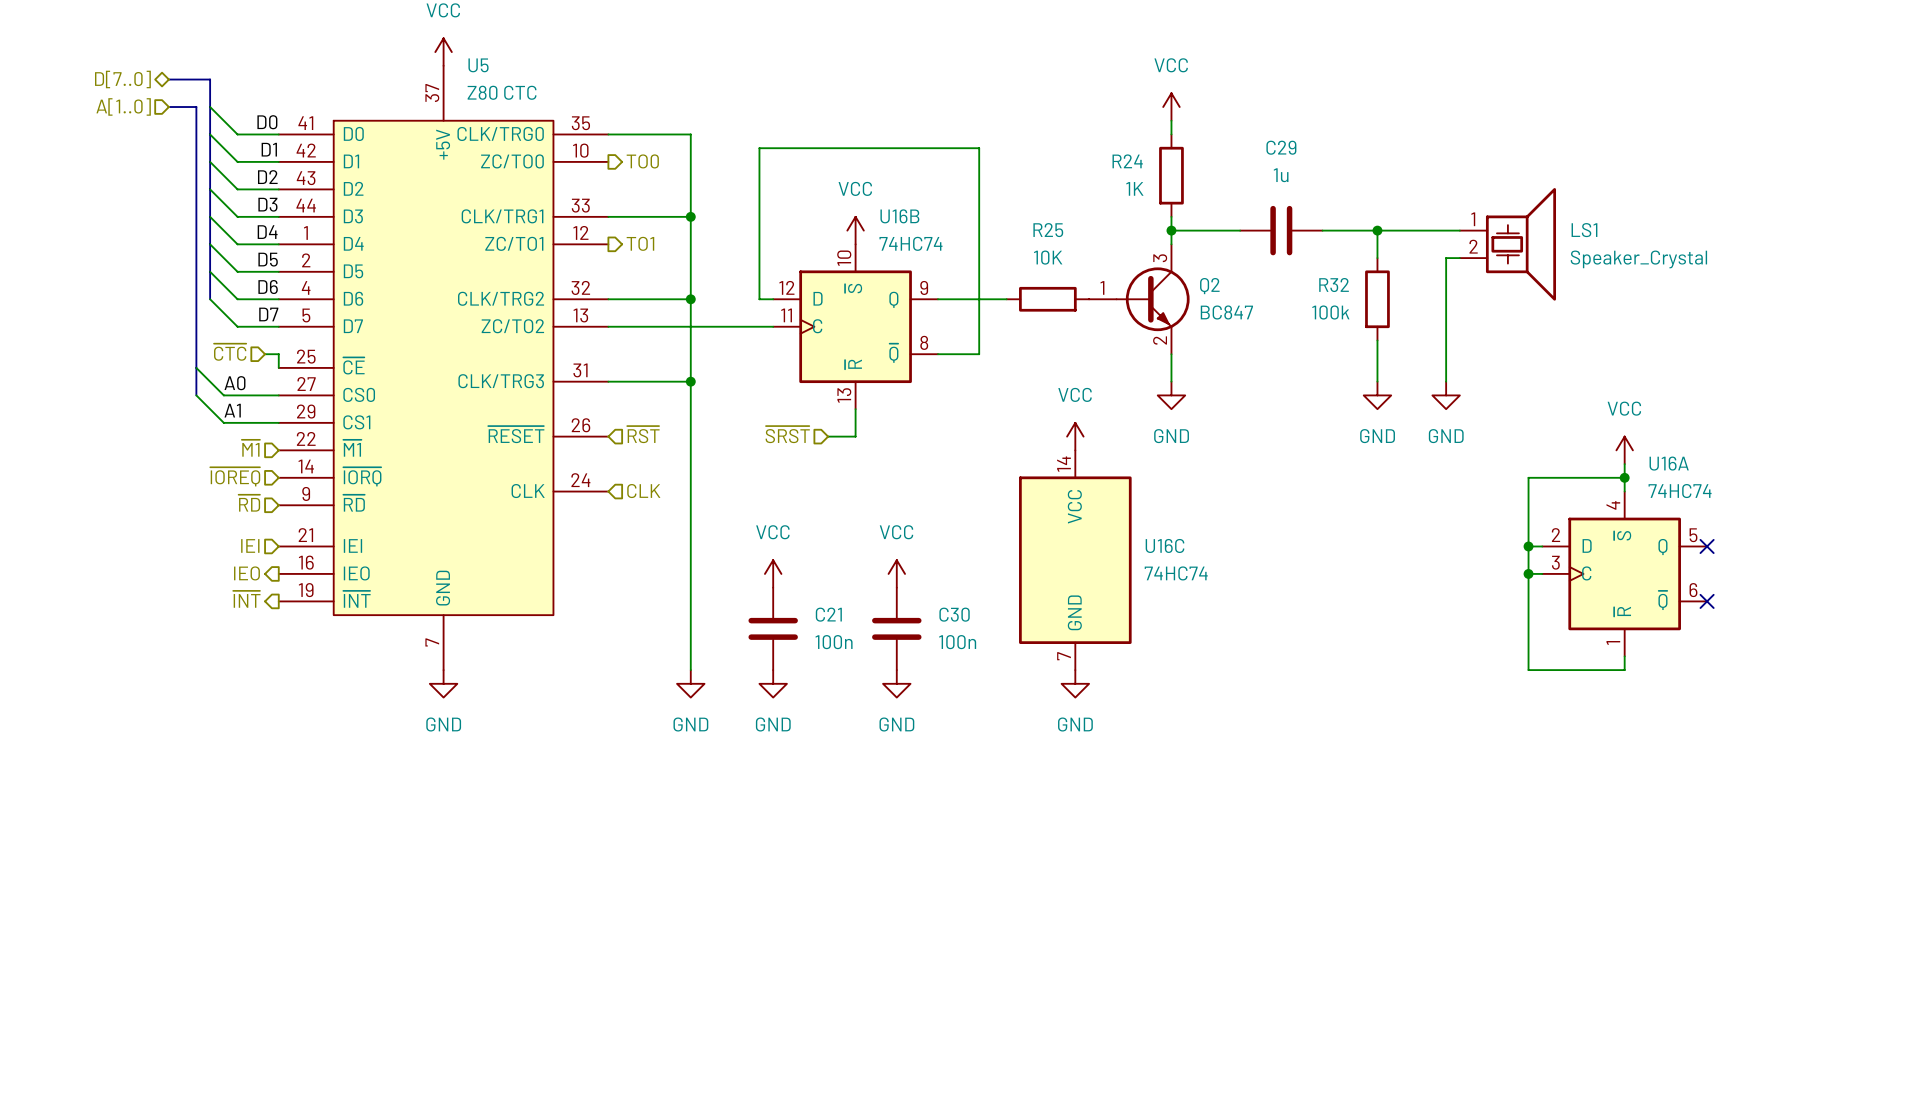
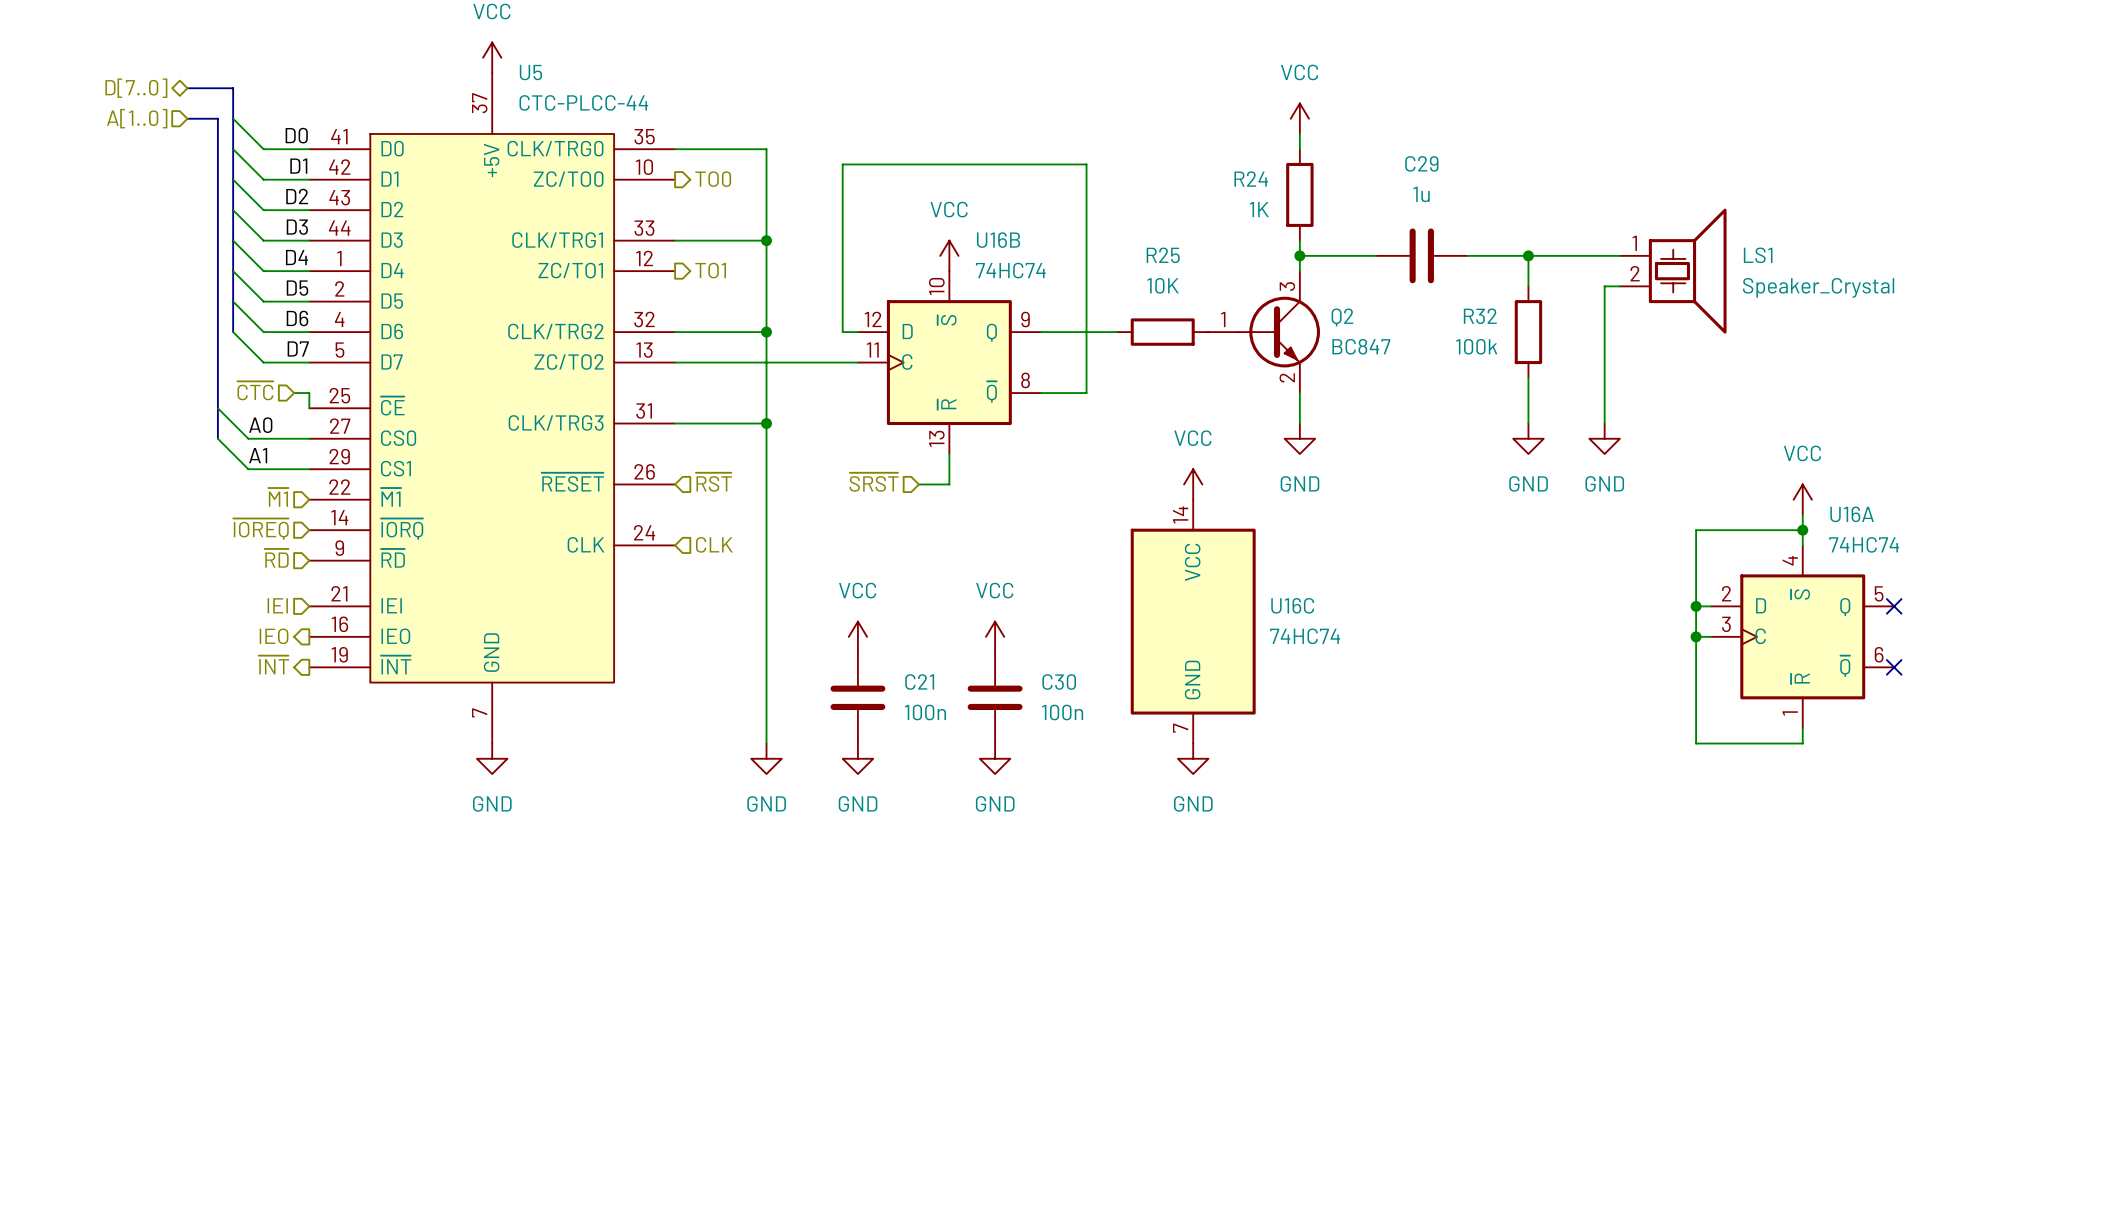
U5 value: Z80 CTC (502, 92) -> CTC-PLCC-44 (583, 102)

